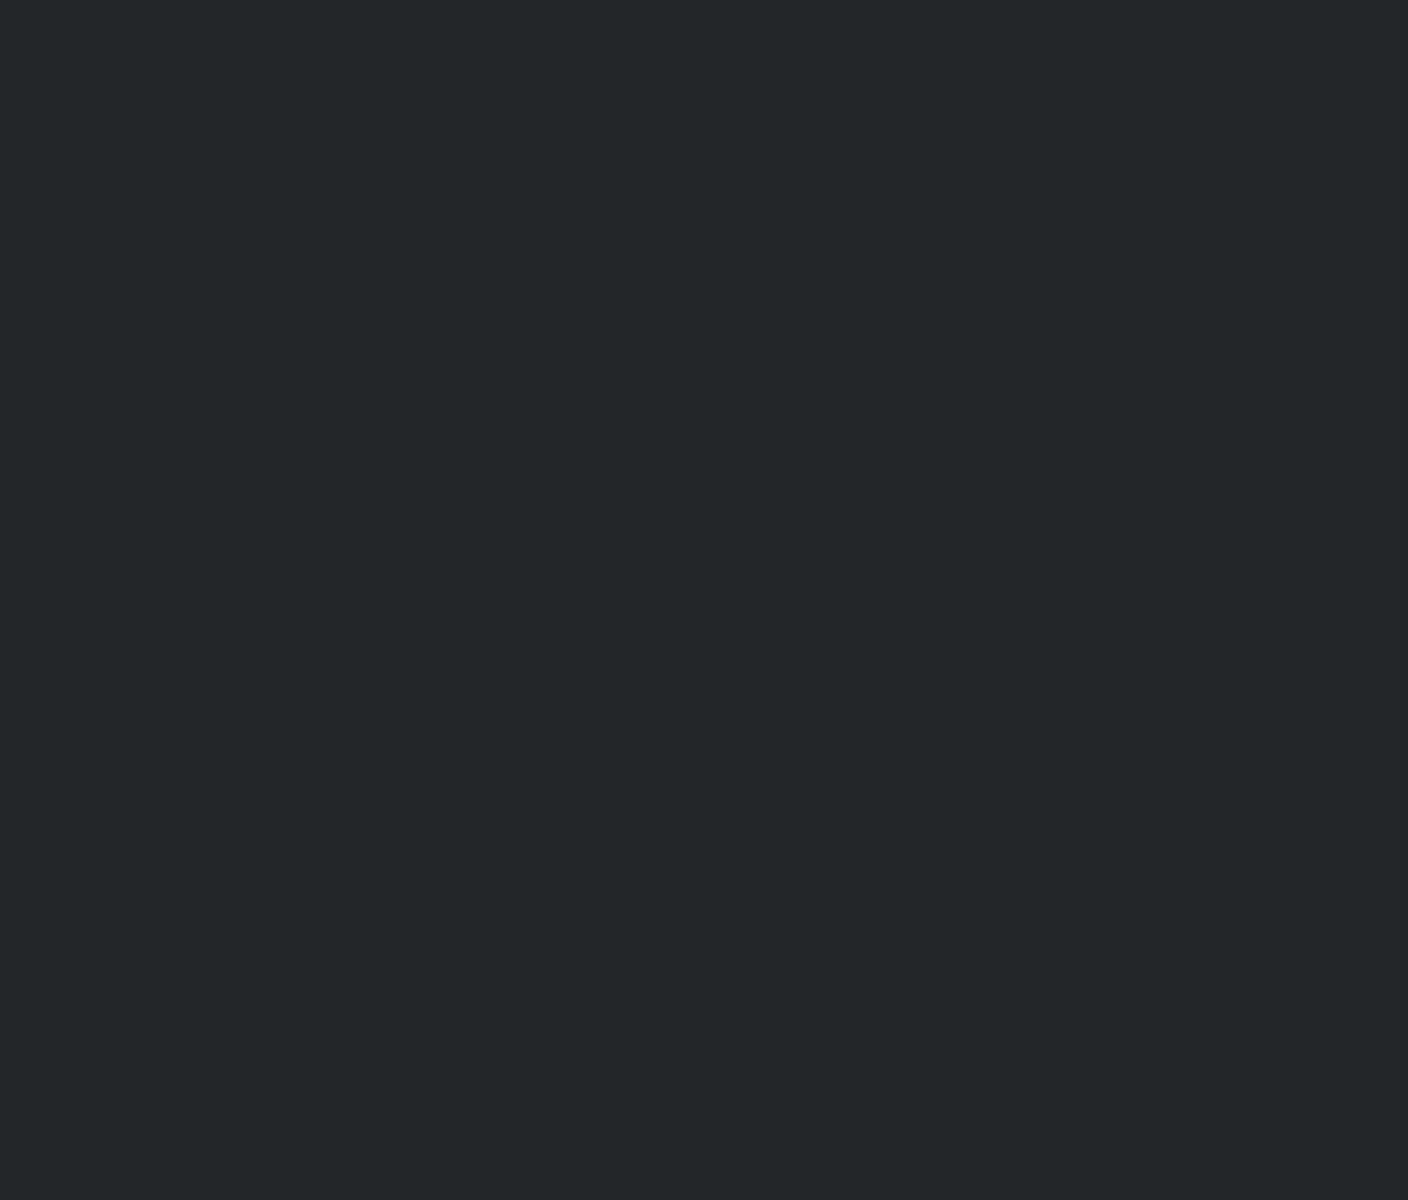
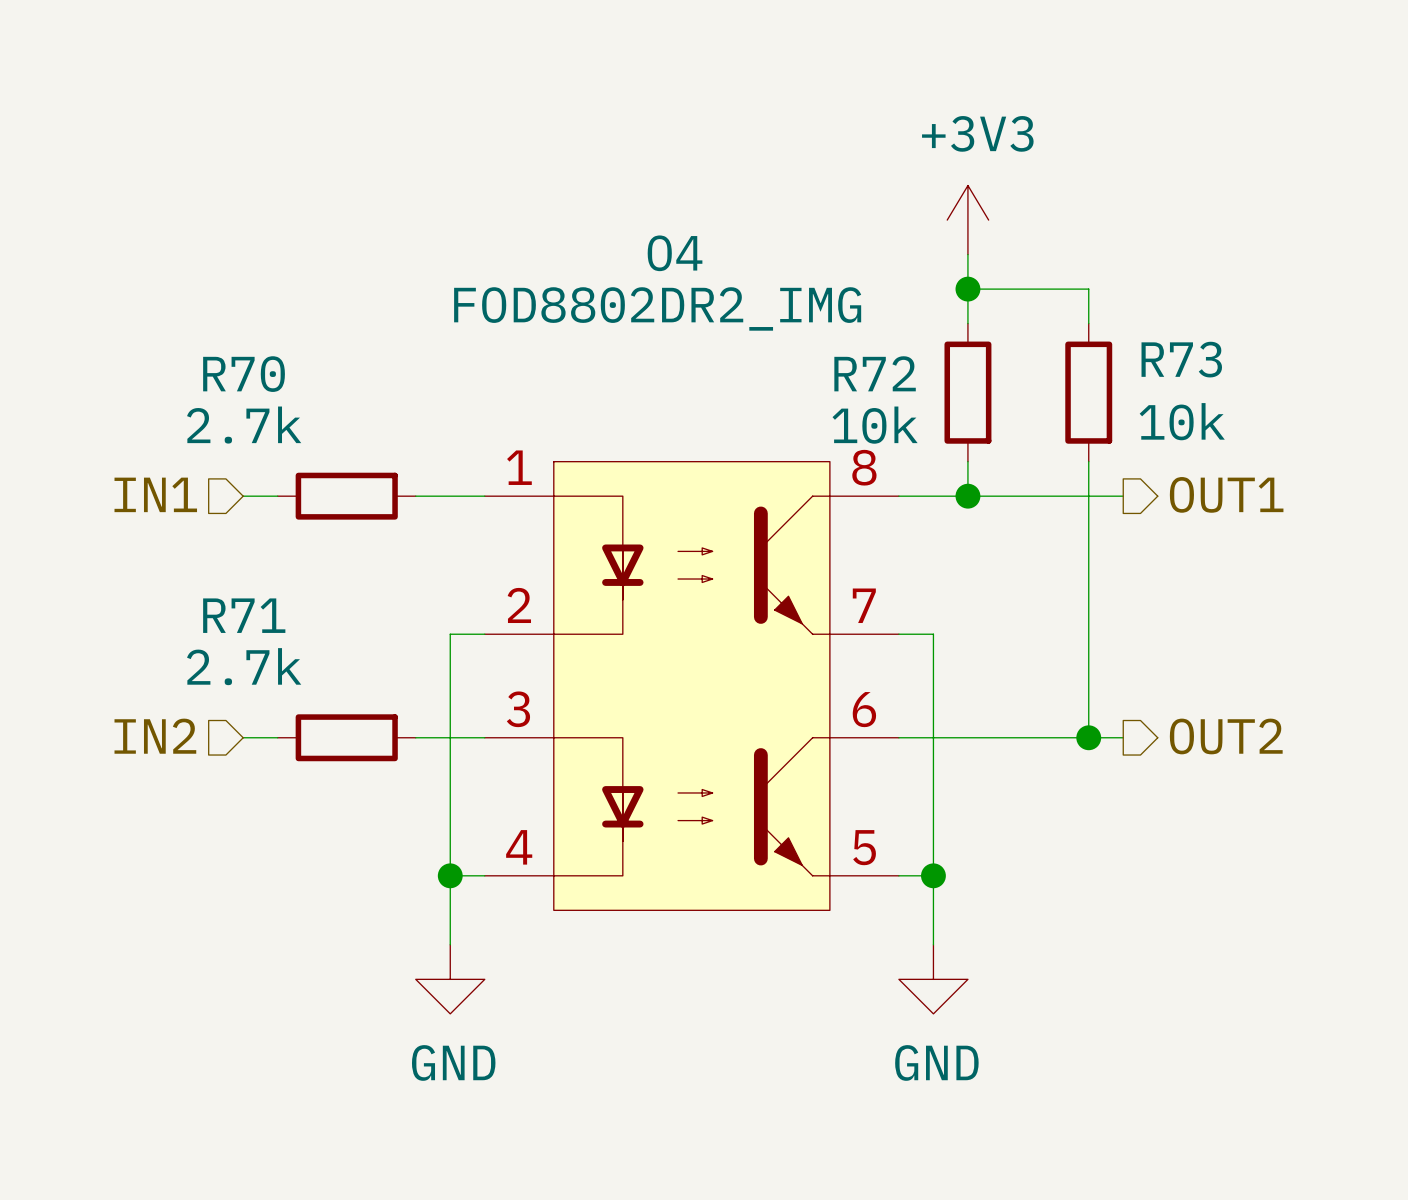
power symbol: none -> +3V3 (967, 220)
wire: none -> (967, 254) (967, 323)
wire: none -> (967, 289) (1088, 289) (1088, 323)
junction: none -> (967, 289)
R72: none -> 10k (967, 392)
R73: none -> 10k (1088, 392)
wire: none -> (967, 461) (967, 496)
wire: none -> (1088, 461) (1088, 737)
hierarchical label: none -> IN1 (155, 494)
hierarchical label: none -> OUT1 (1226, 494)
wire: none -> (243, 496) (277, 496)
R70: none -> 2.7k (346, 496)
wire: none -> (415, 496) (484, 496)
wire: none -> (898, 496) (1123, 496)
junction: none -> (967, 496)
wire: none -> (484, 634) (450, 634) (450, 944)
wire: none -> (898, 634) (933, 634) (933, 944)
O4: none -> FOD8802DR2_IMG (691, 685)
hierarchical label: none -> IN2 (155, 736)
hierarchical label: none -> OUT2 (1226, 736)
wire: none -> (243, 737) (277, 737)
R71: none -> 2.7k (346, 737)
wire: none -> (415, 737) (484, 737)
wire: none -> (898, 737) (1123, 737)
junction: none -> (1088, 737)
wire: none -> (450, 875) (484, 875)
junction: none -> (450, 875)
wire: none -> (898, 875) (933, 875)
junction: none -> (933, 875)
power symbol: none -> GND (450, 979)
power symbol: none -> GND (933, 979)

